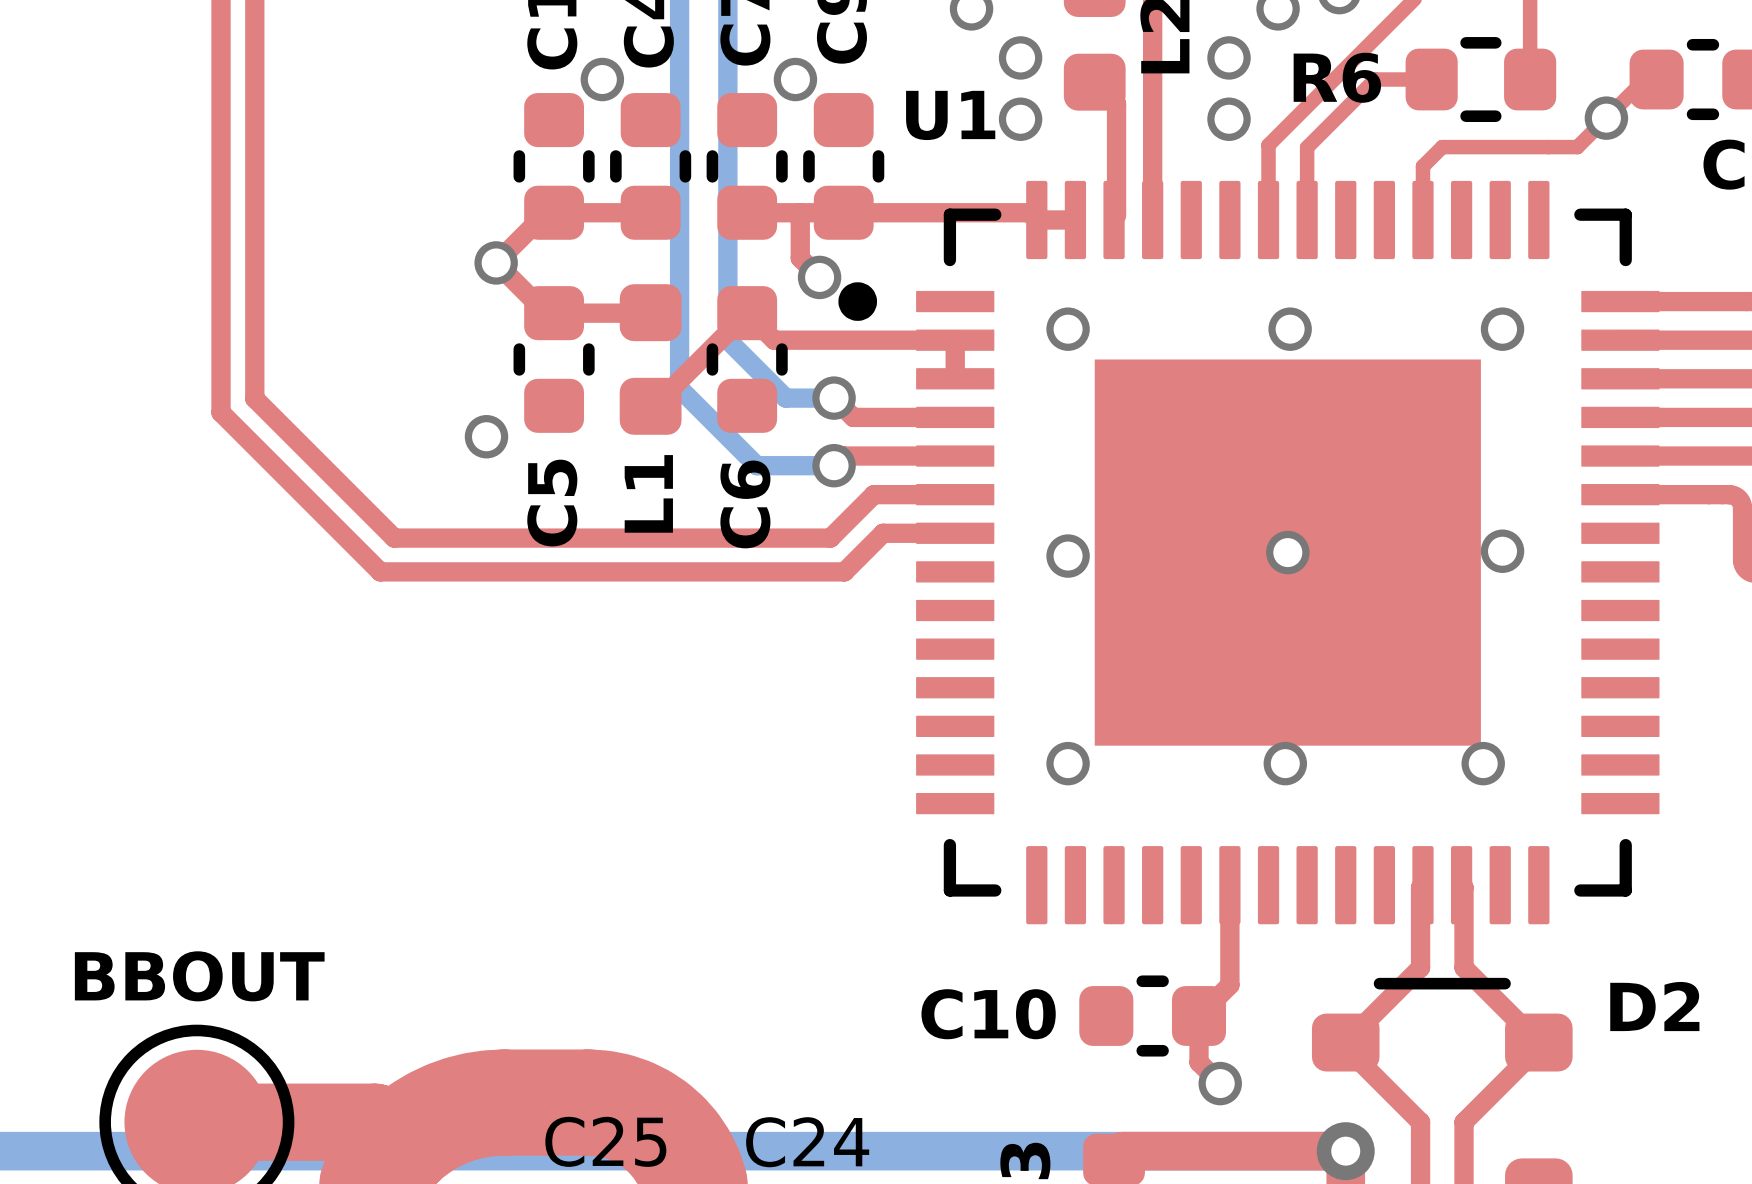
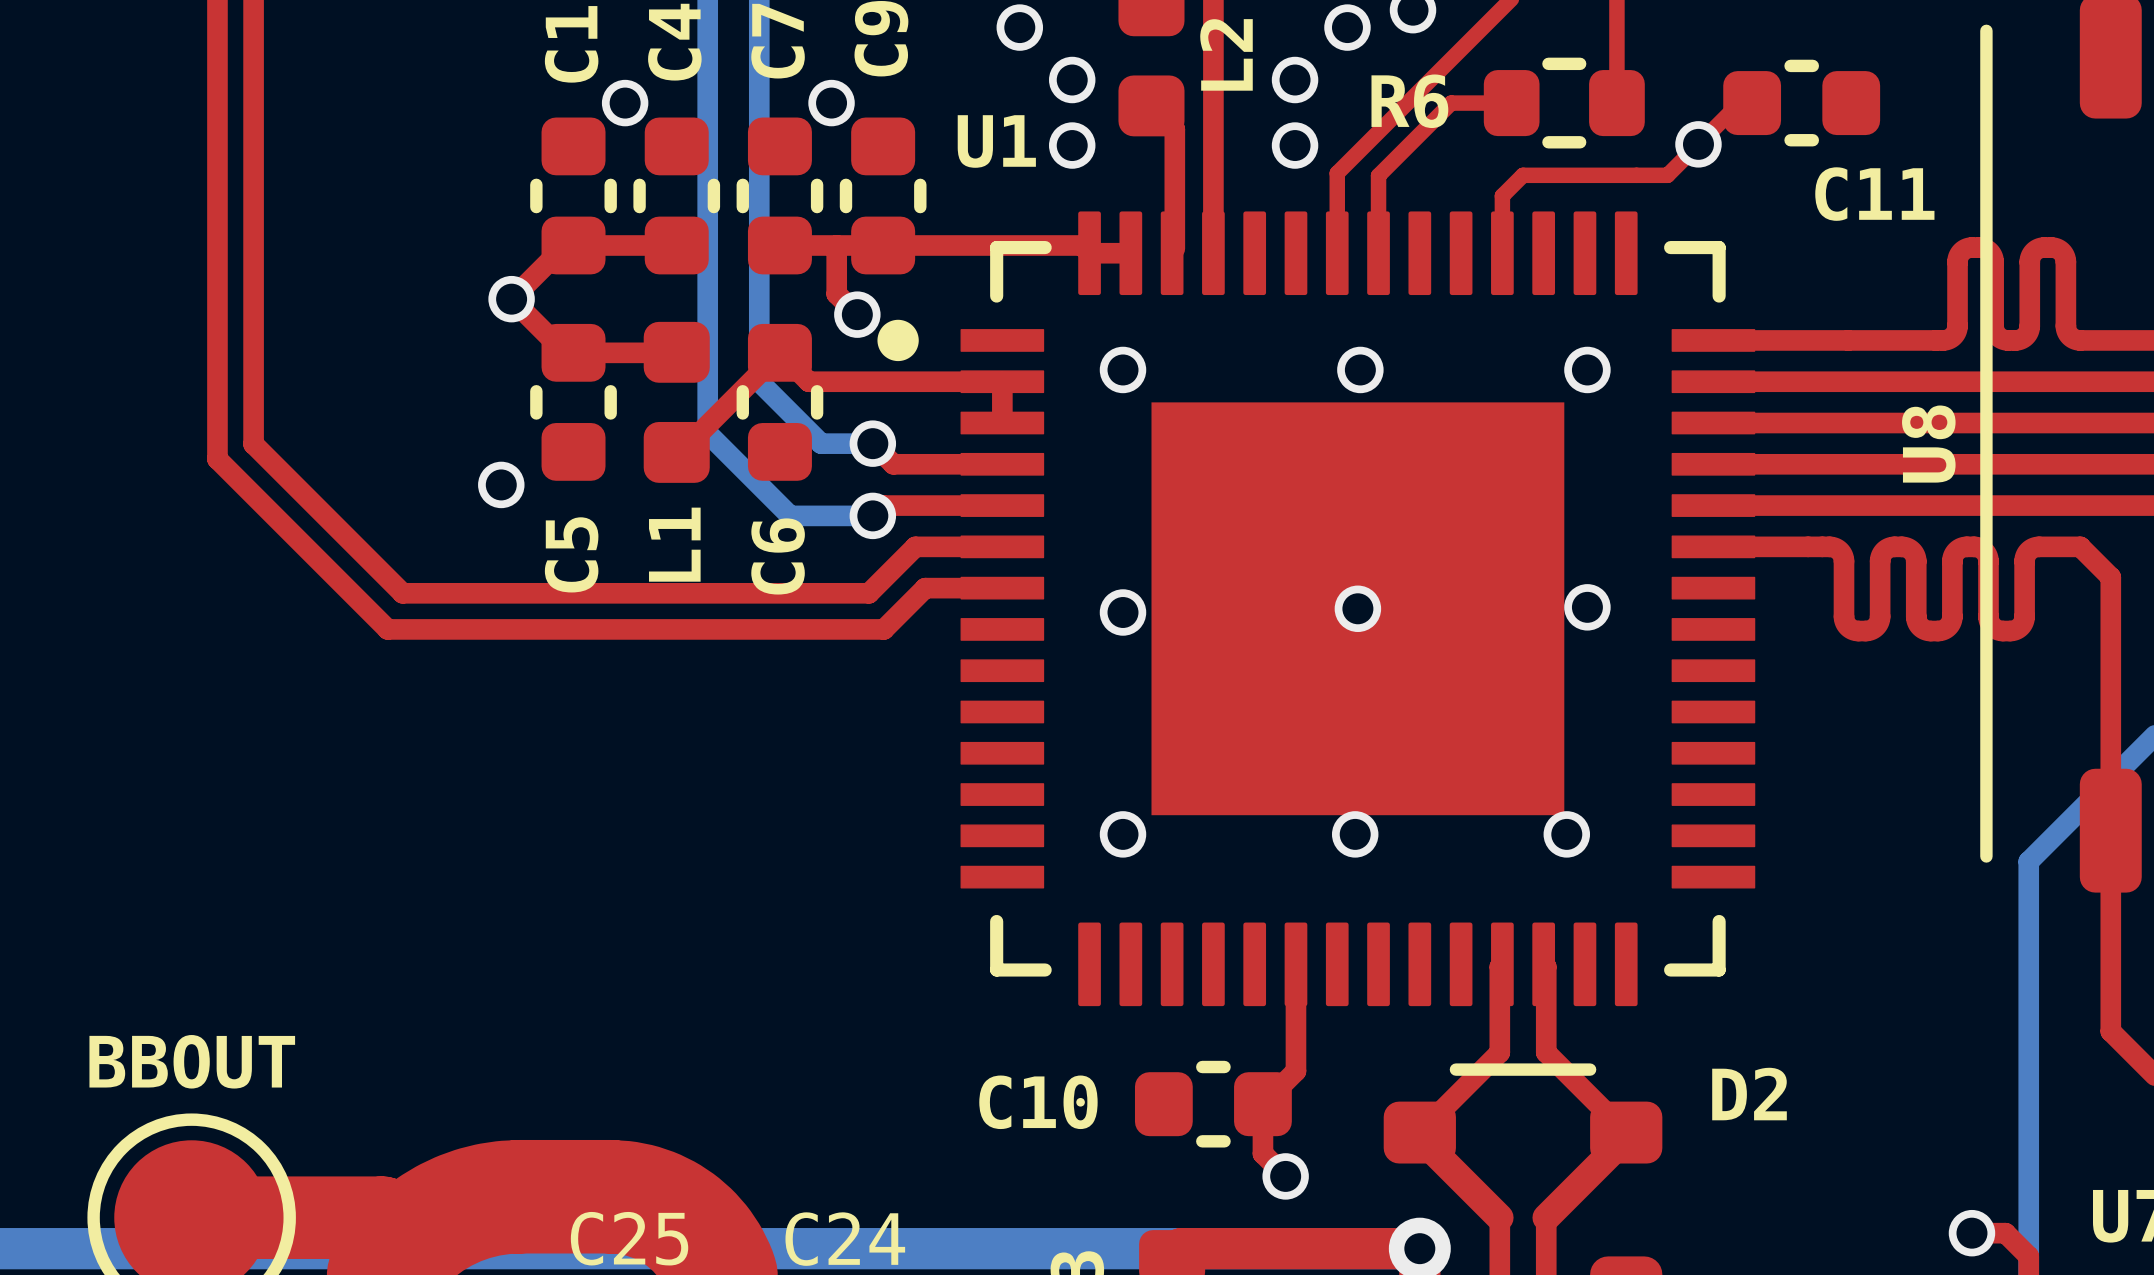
top track width: thin (1345, 1042) (1345, 1047) (1420, 1122) -> thick (1419, 1132) (1419, 1137) (1499, 1217)
top track width: thin (1538, 1042) (1538, 1047) (1464, 1122) -> thick (1626, 1132) (1626, 1137) (1546, 1217)

